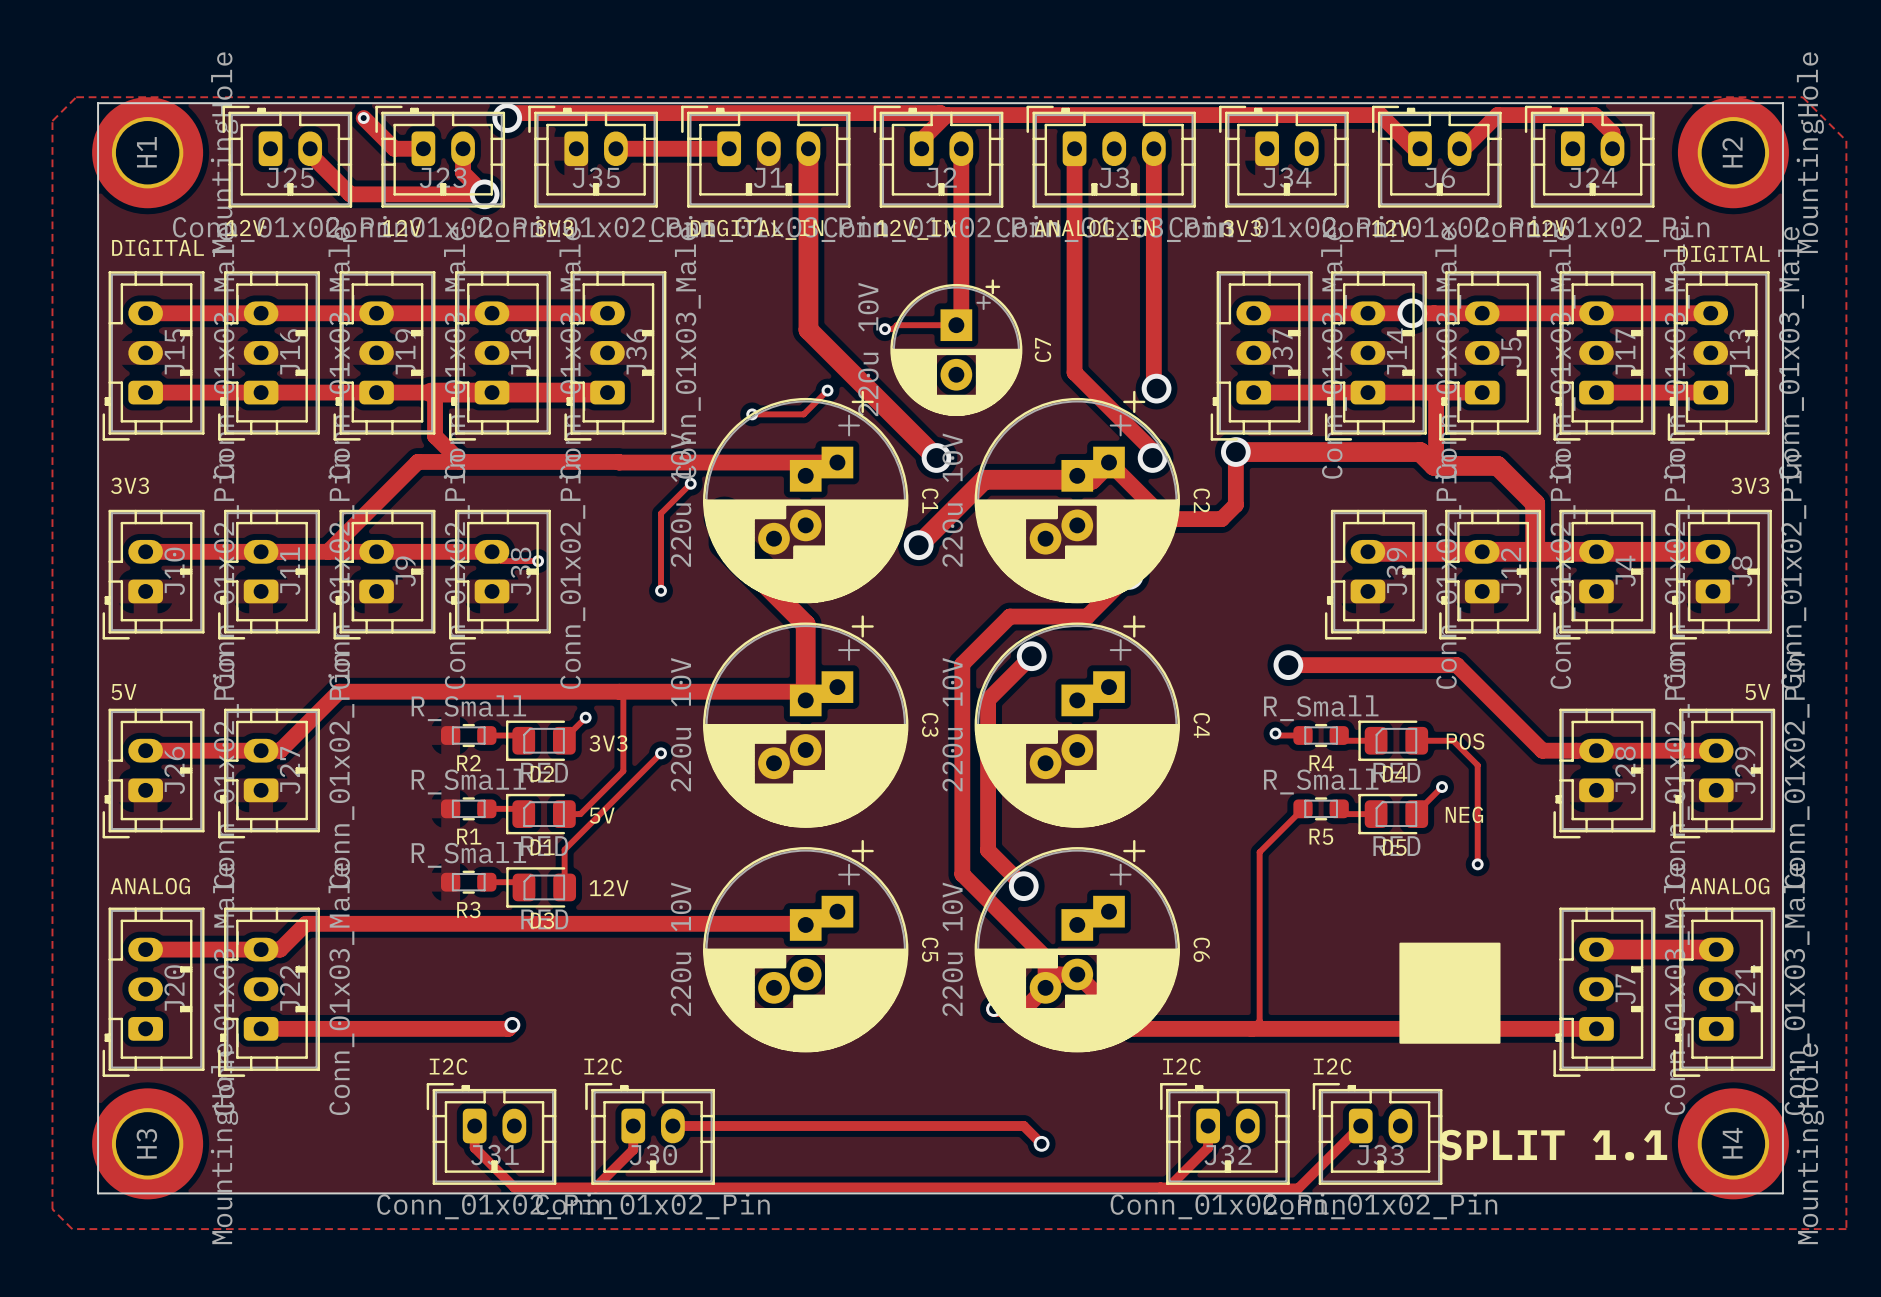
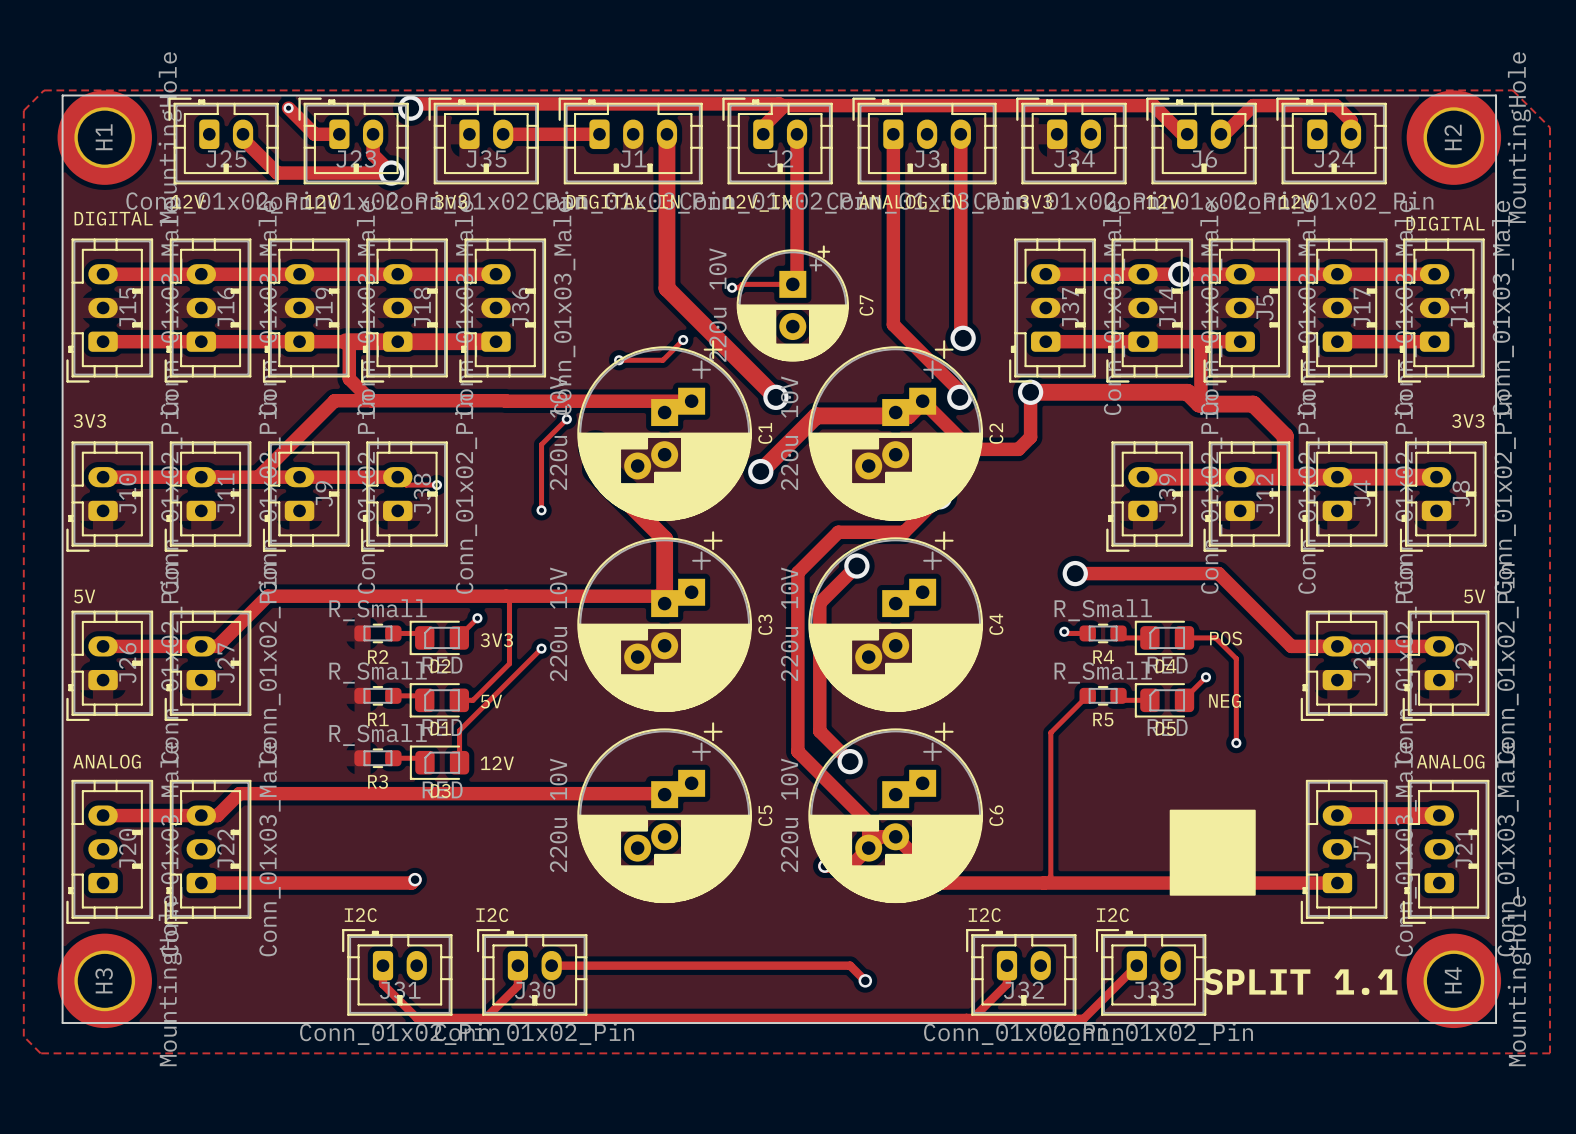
C1 name rotation: 0° (930, 500) -> 180° (765, 433)
C2 name rotation: 0° (1201, 500) -> 180° (996, 433)
C3 name rotation: 0° (930, 725) -> 180° (765, 624)
C4 name rotation: 0° (1201, 725) -> 180° (996, 624)
C5 name rotation: 0° (930, 949) -> 180° (765, 815)
C6 name rotation: 0° (1201, 949) -> 180° (996, 815)

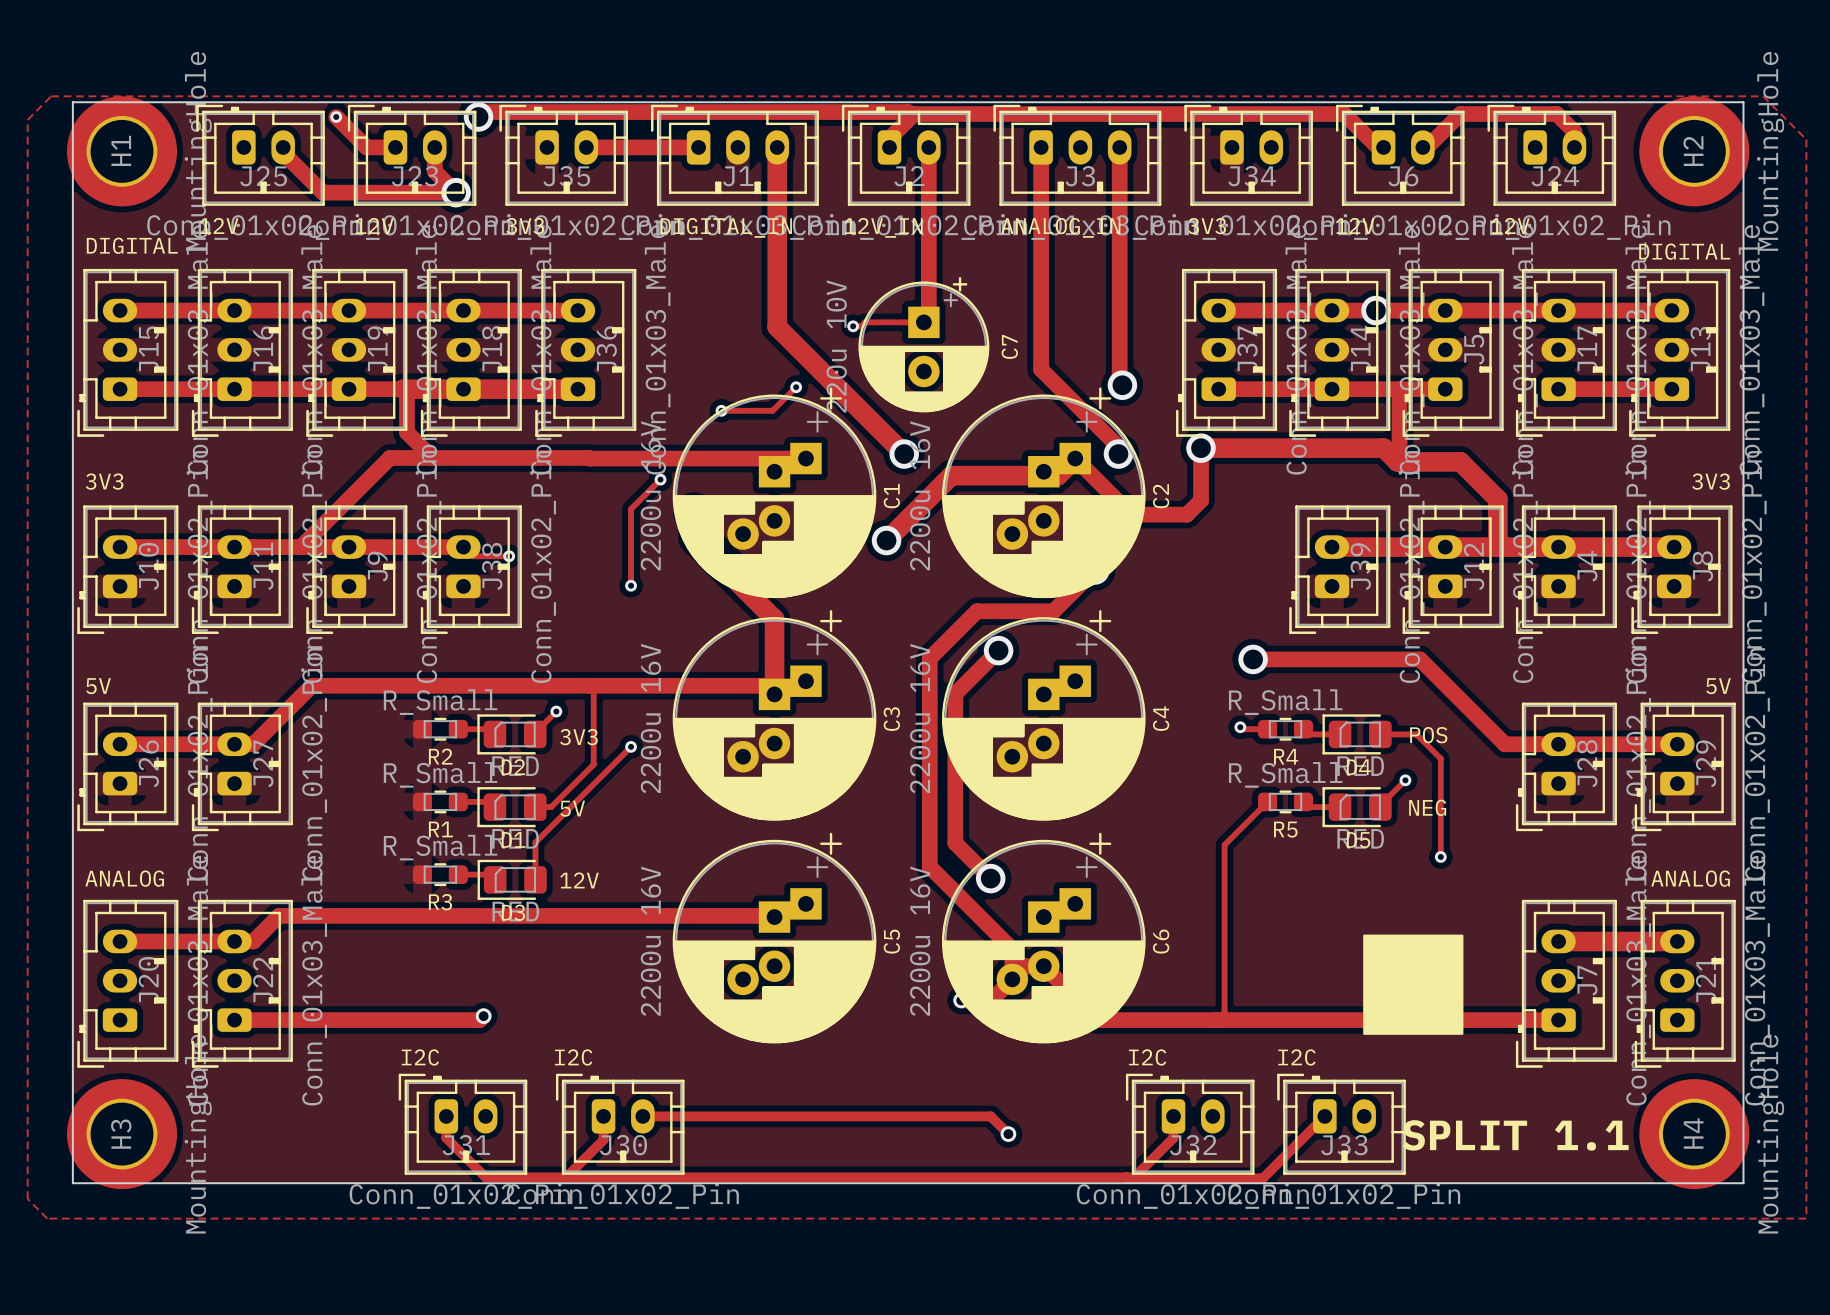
C1 value: 220u 10V (558, 433) -> 2200u 16V (650, 495)
C2 value: 220u 10V (789, 433) -> 2200u 16V (920, 495)
C3 value: 220u 10V (558, 624) -> 2200u 16V (650, 718)
C4 value: 220u 10V (789, 624) -> 2200u 16V (920, 718)
C5 value: 220u 10V (558, 815) -> 2200u 16V (650, 941)
C6 value: 220u 10V (789, 815) -> 2200u 16V (920, 941)

